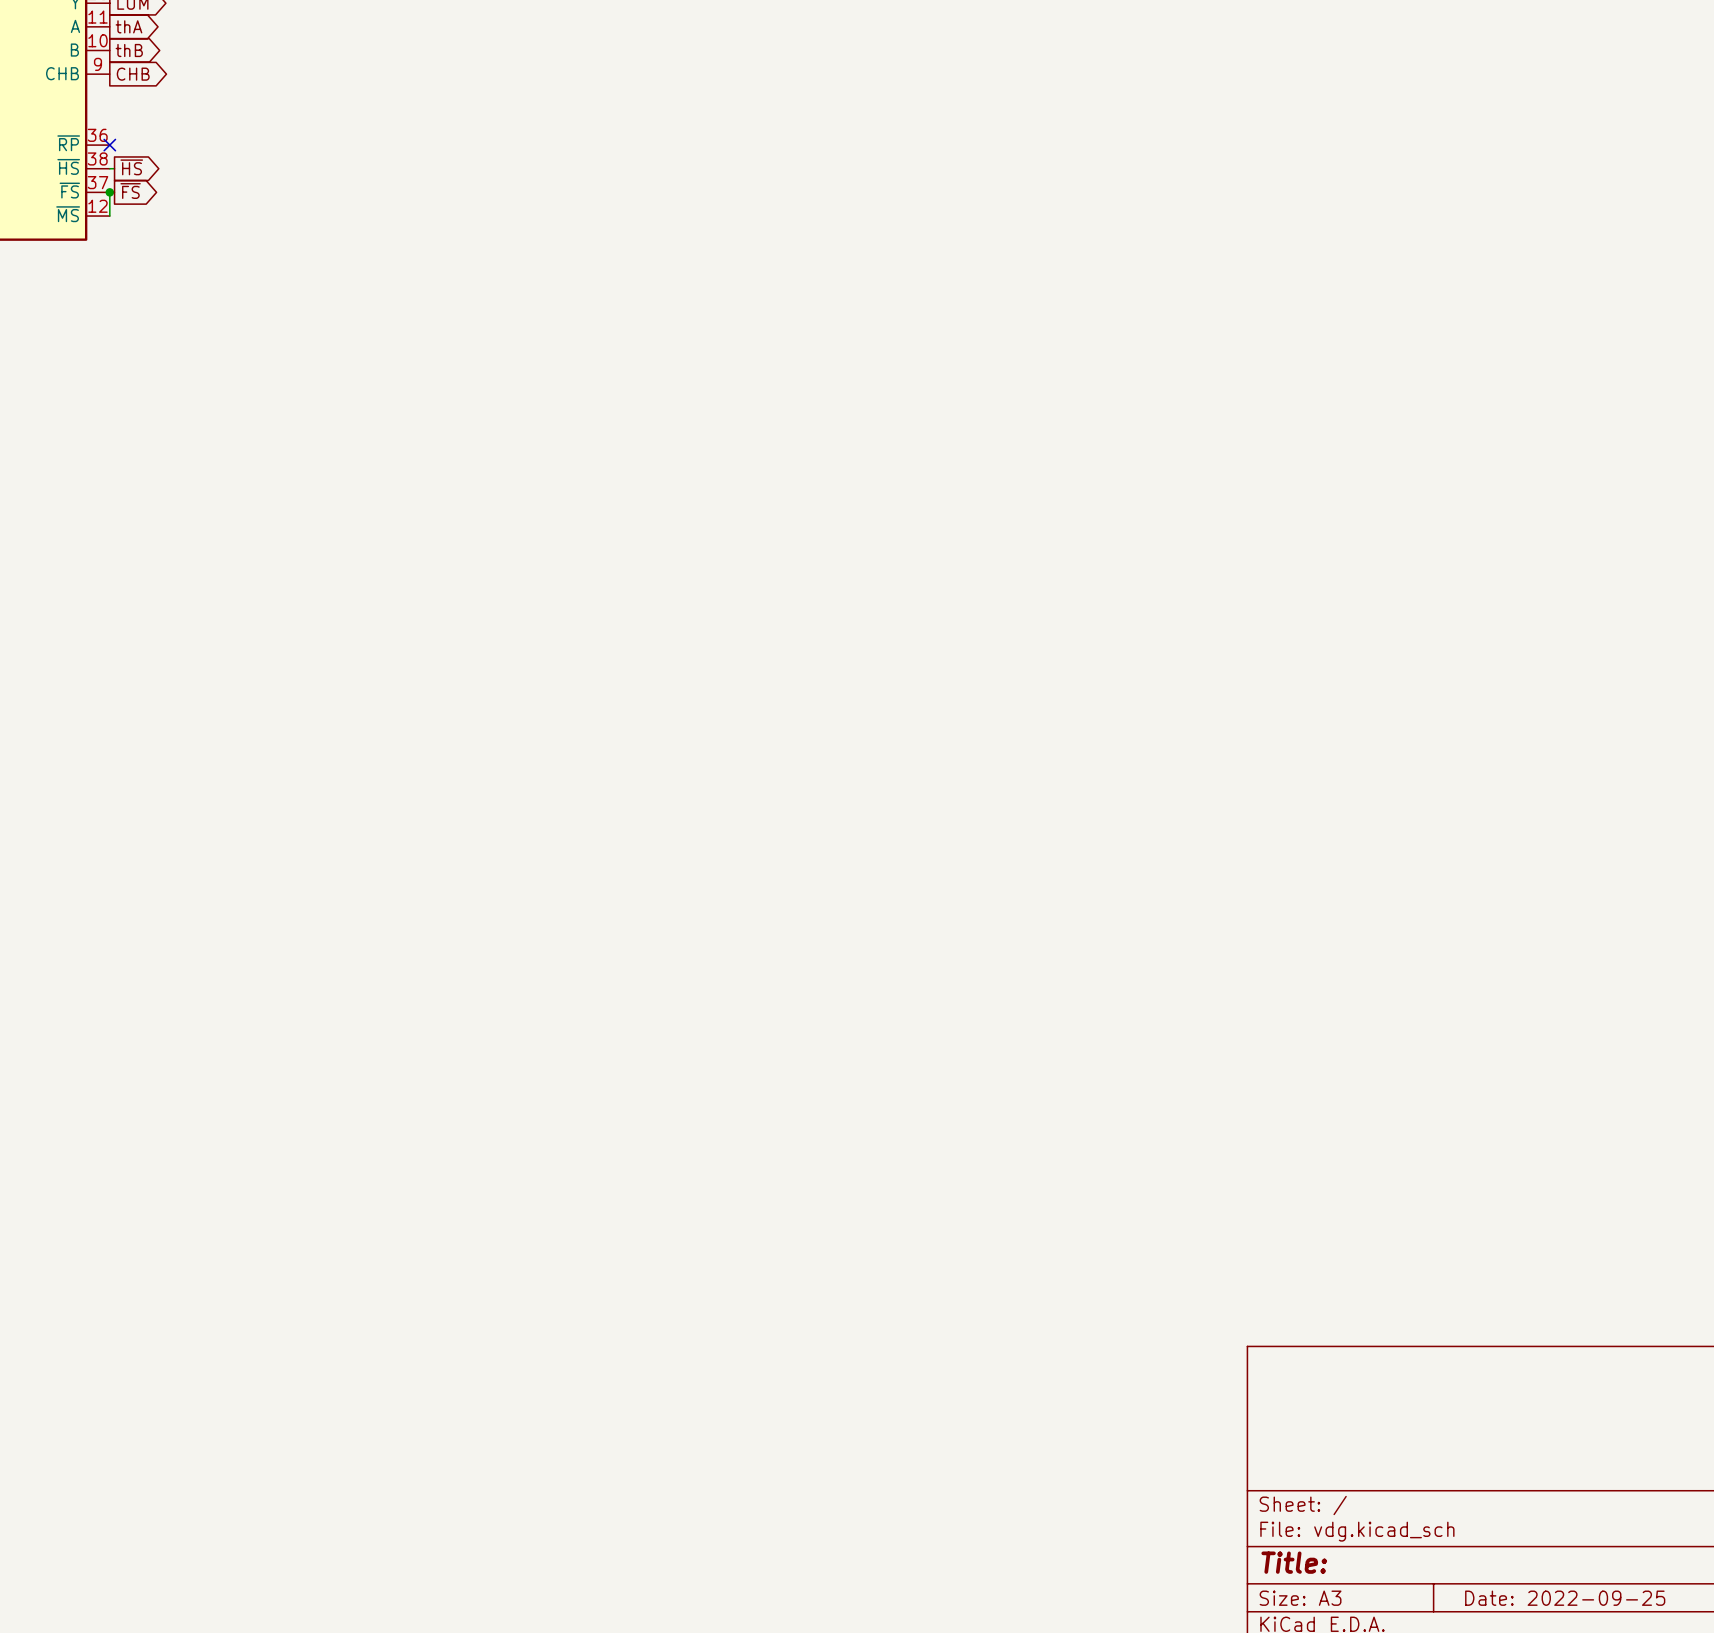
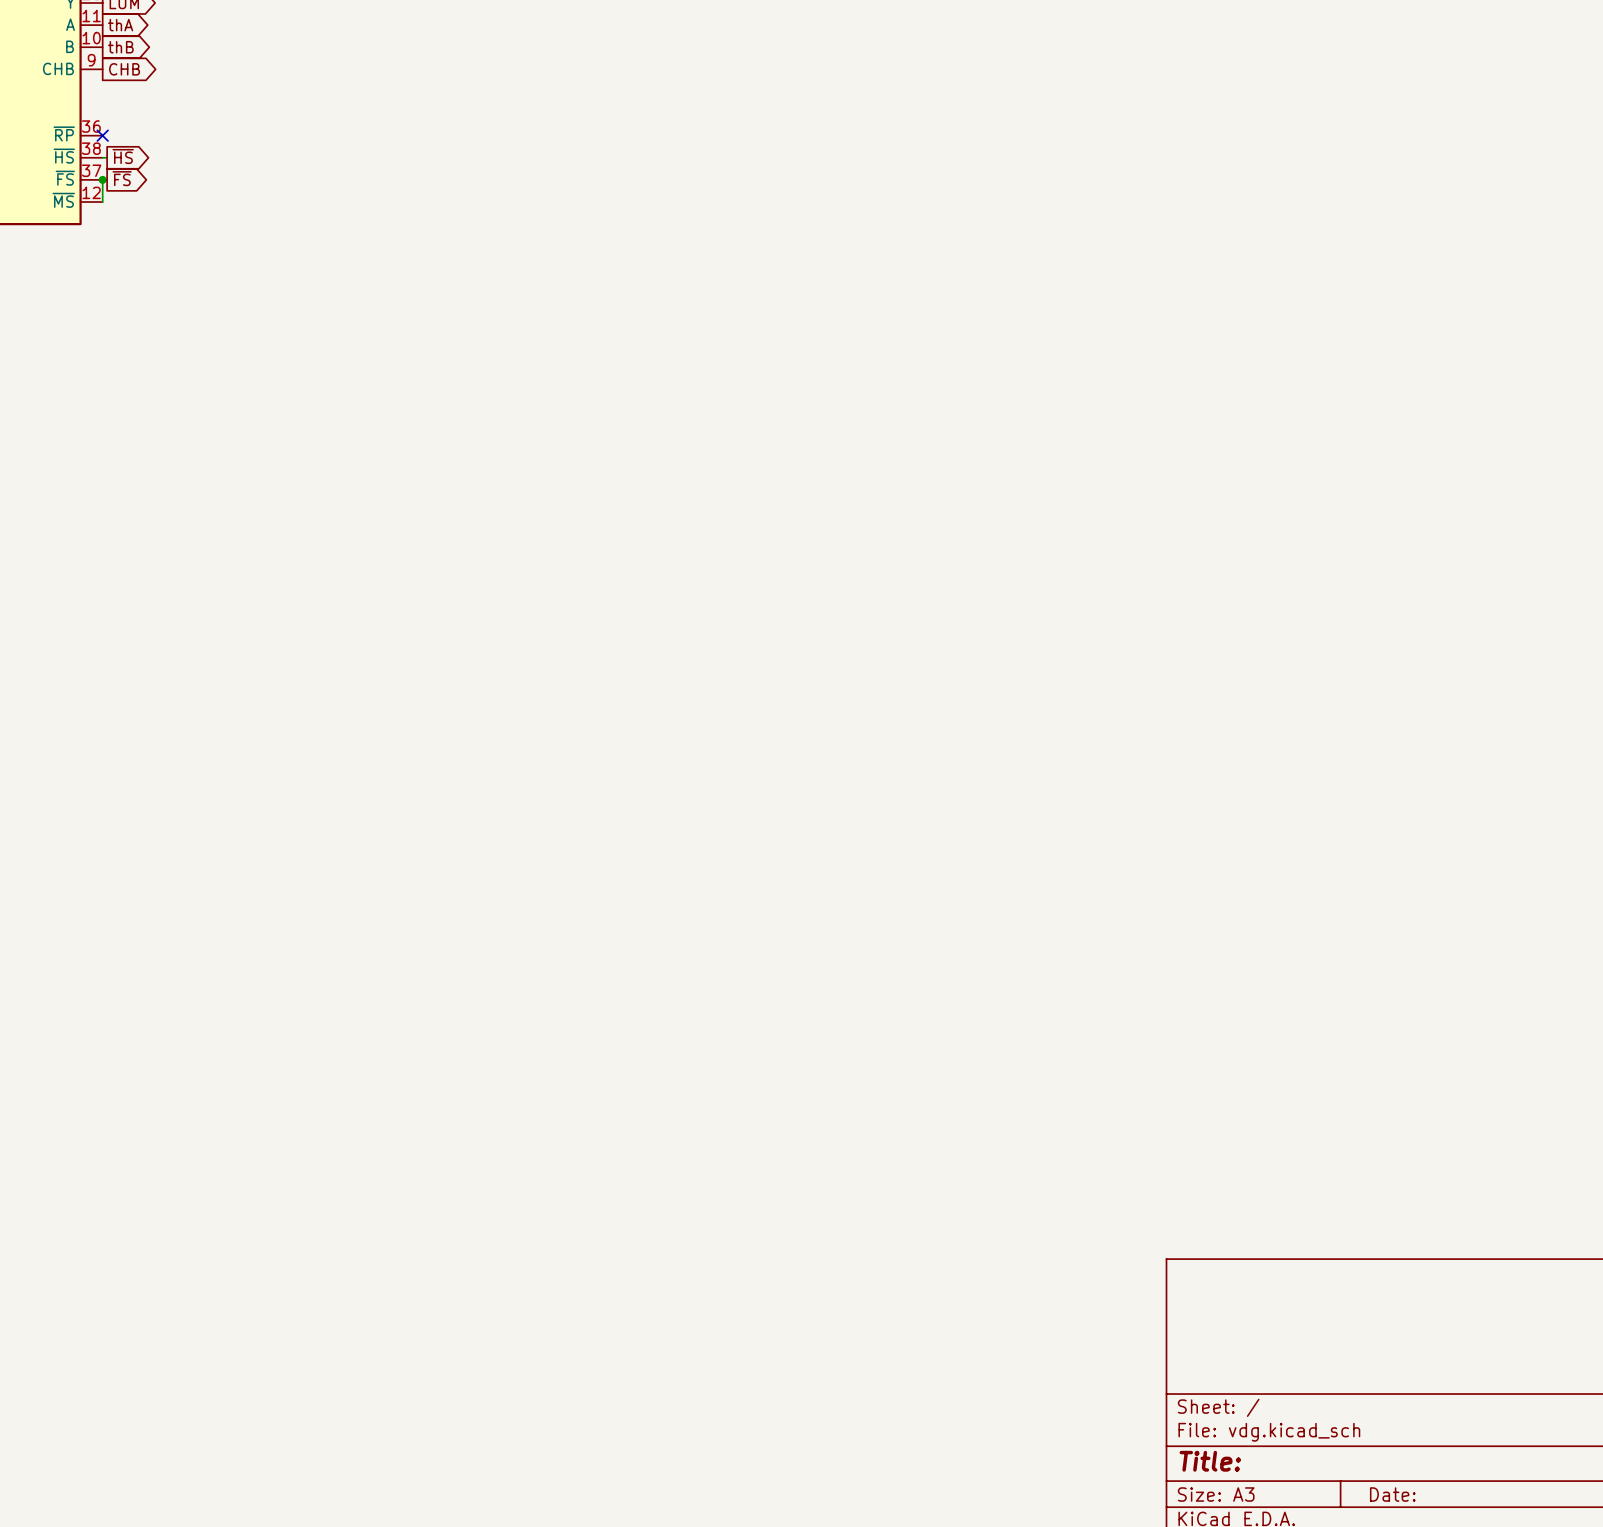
title block: Date: 2022-09-25 (1565, 1598) -> Date: (1392, 1494)

